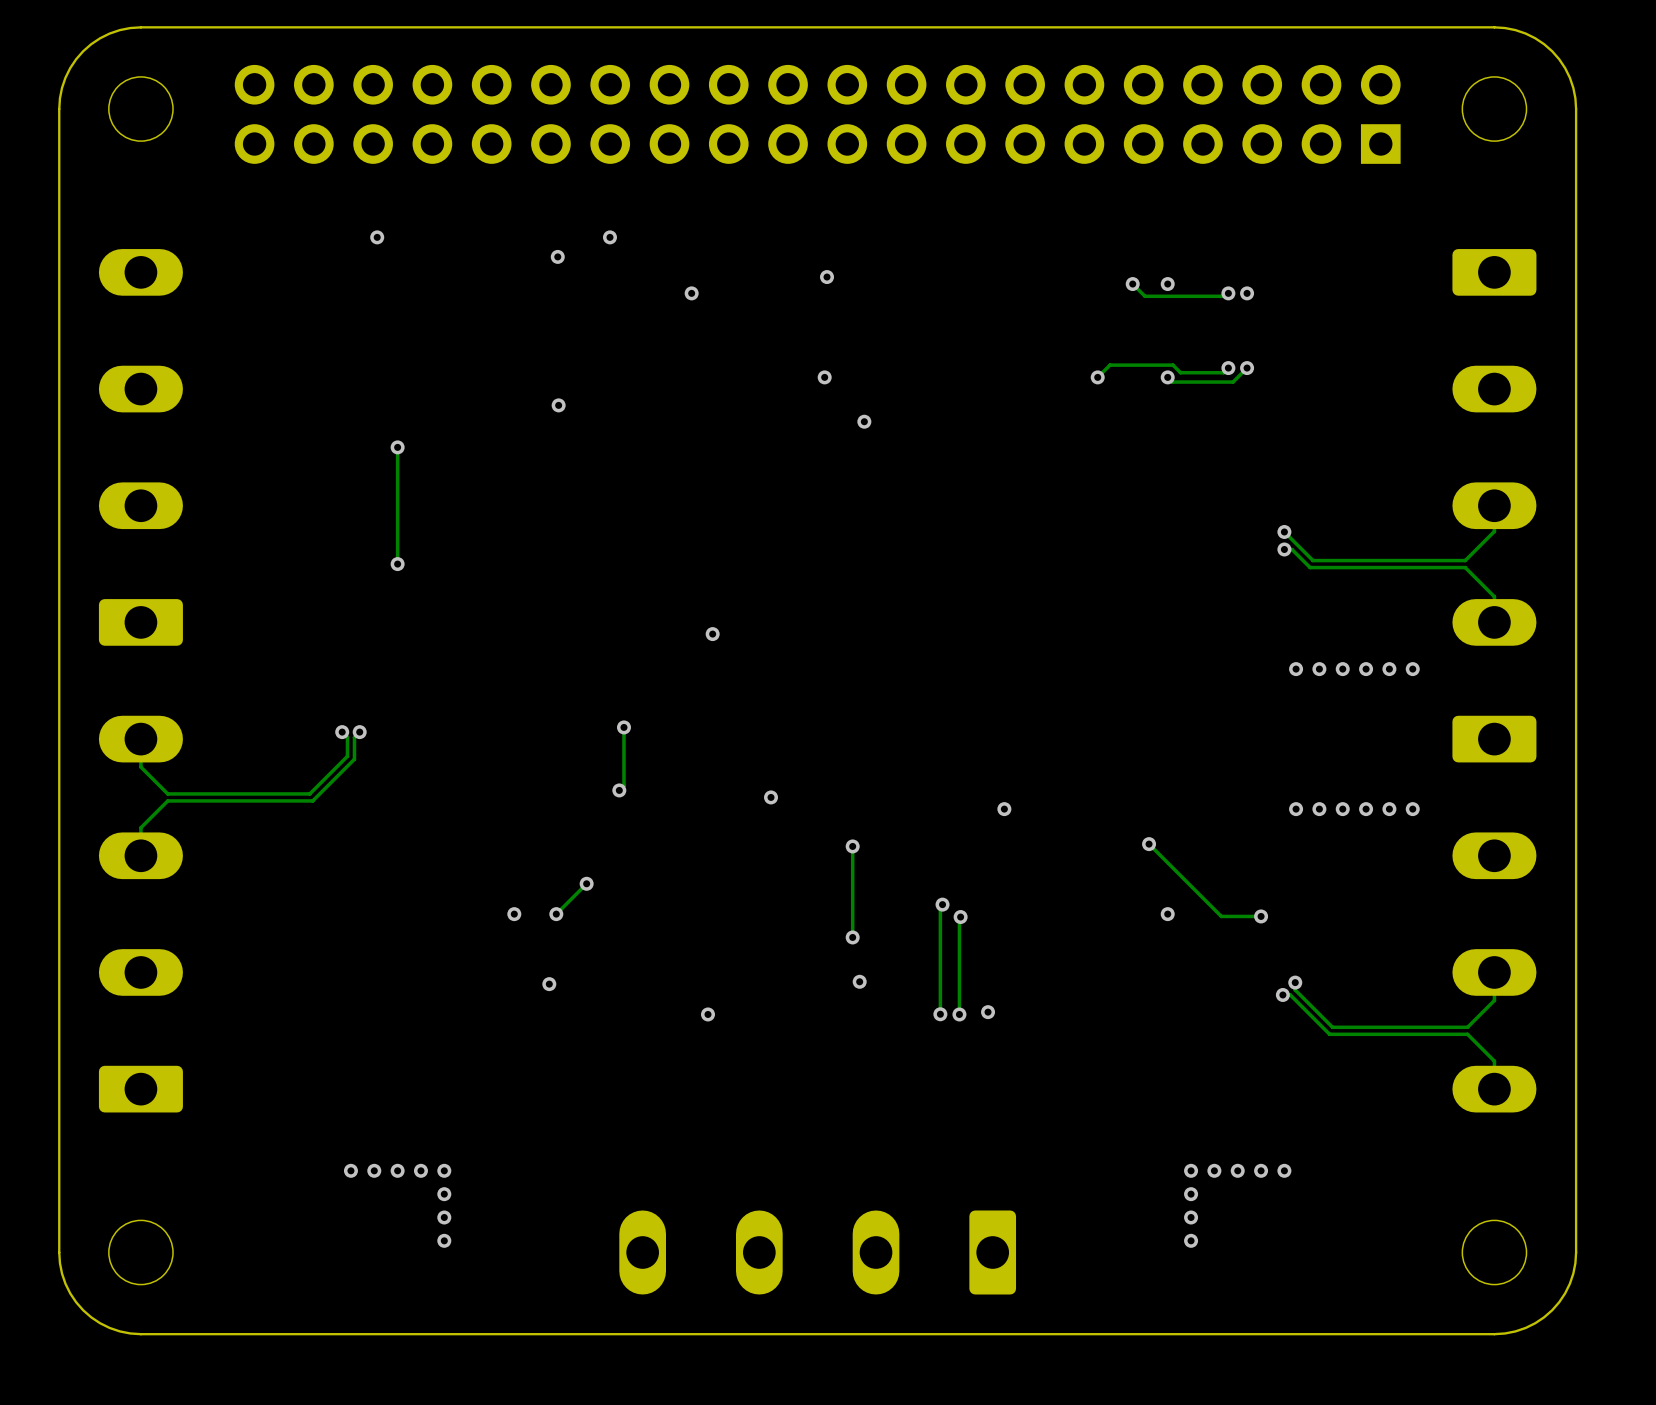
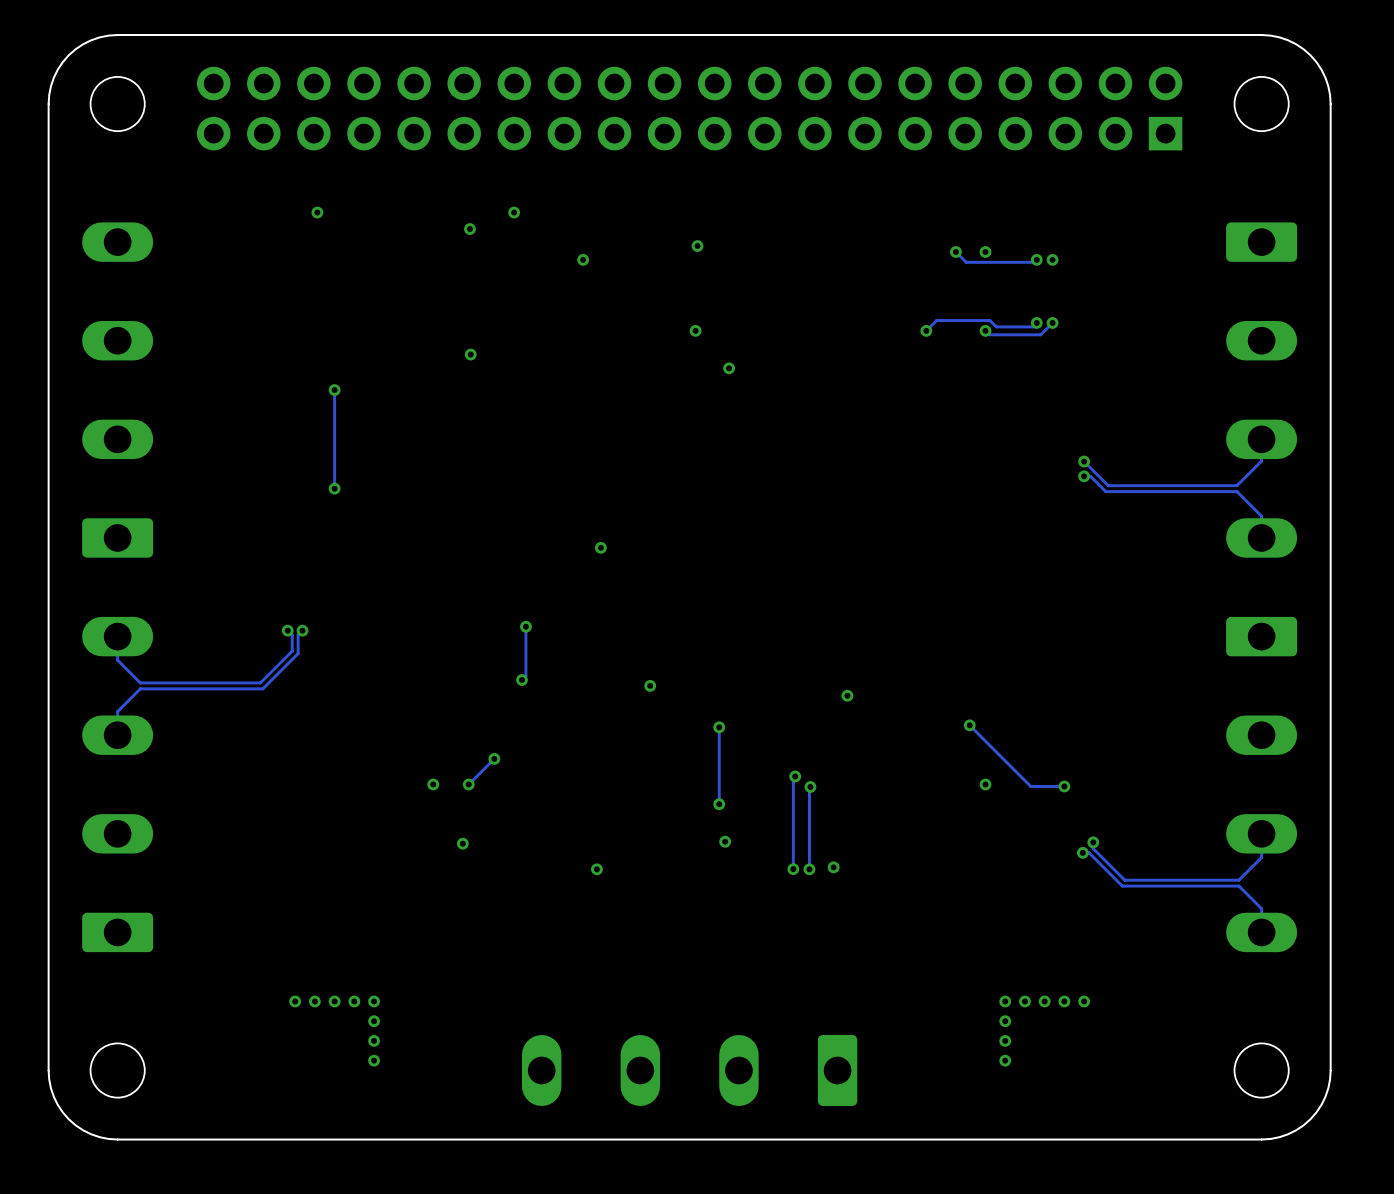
via: (1296, 669) -> none
via: (1319, 669) -> none
via: (1342, 669) -> none
via: (1366, 669) -> none
via: (1389, 669) -> none
via: (1412, 669) -> none
via: (1296, 809) -> none
via: (1319, 809) -> none
via: (1342, 809) -> none
via: (1366, 809) -> none
via: (1389, 809) -> none
via: (1412, 809) -> none

